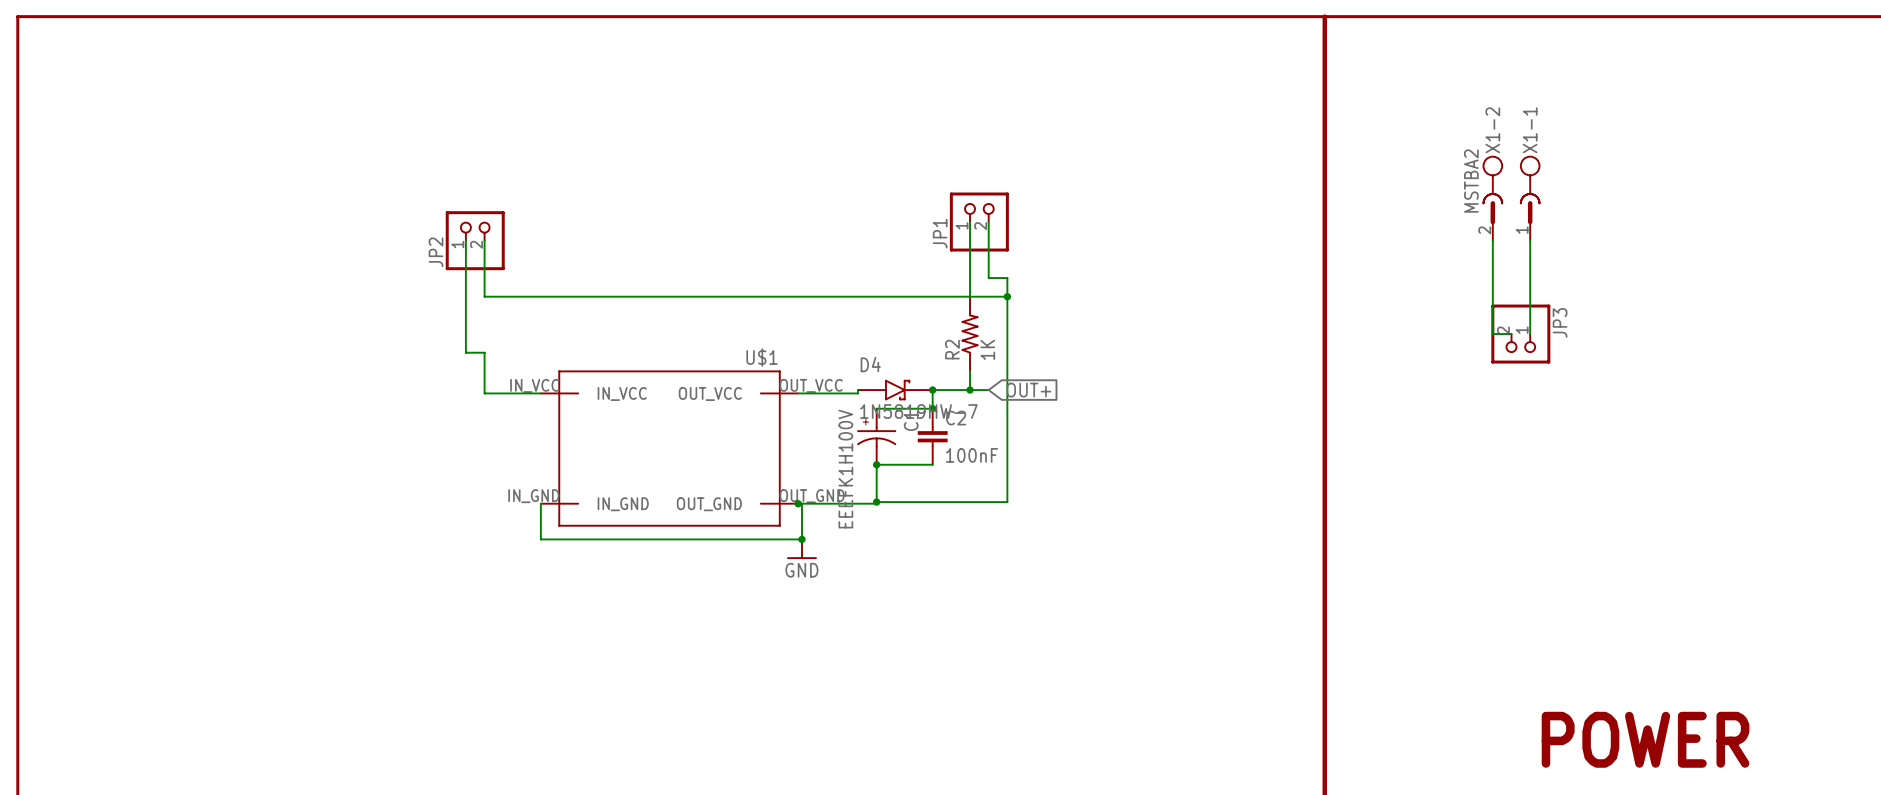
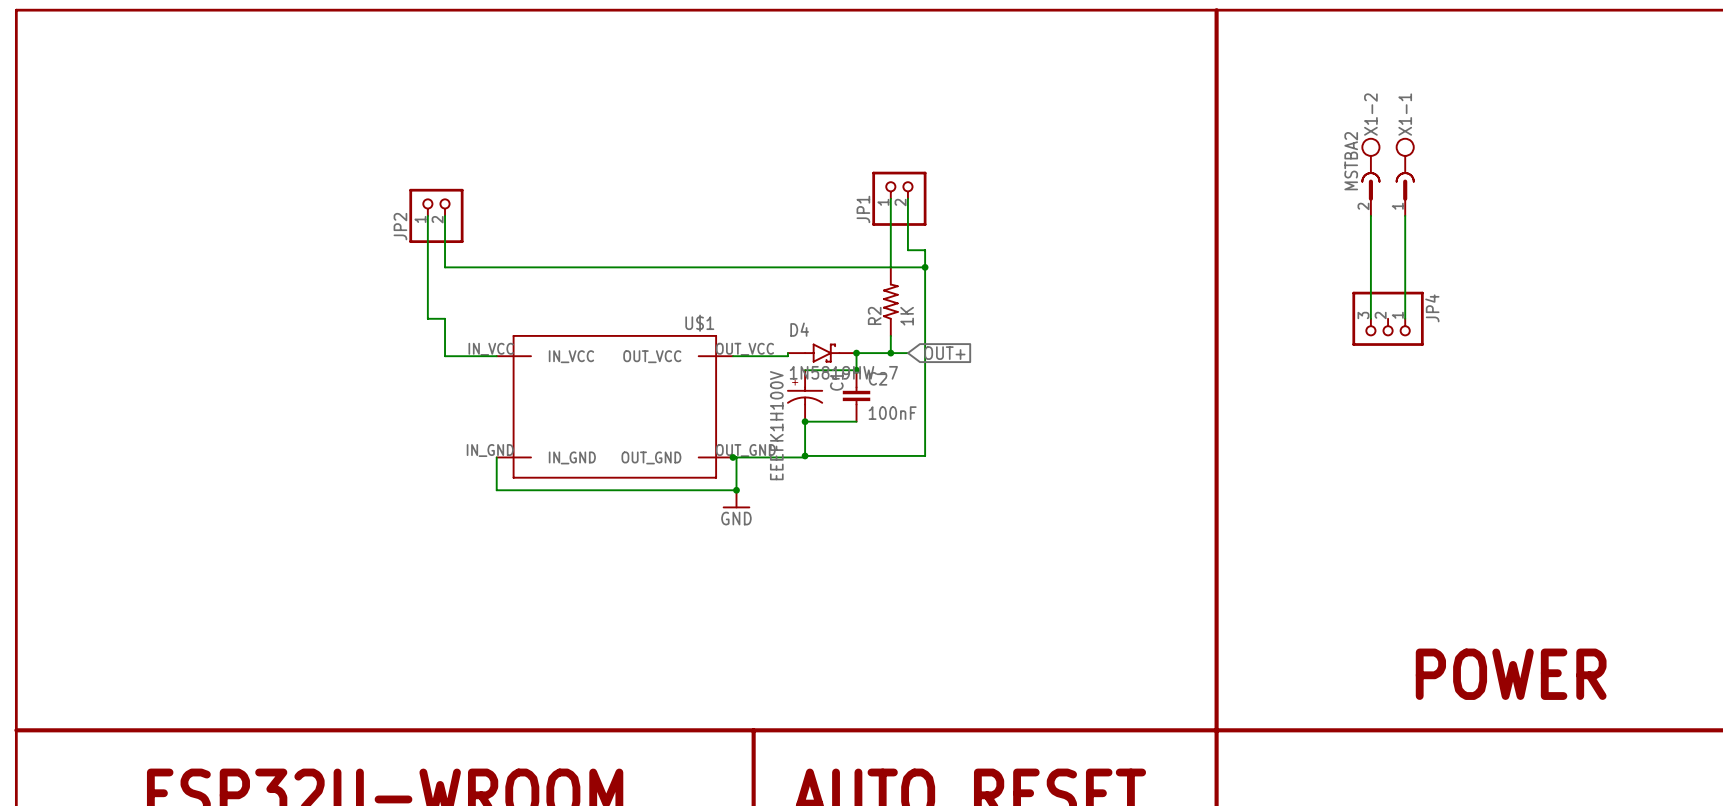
JP3: (1520, 334) -> none
JP4: none -> (1388, 318)

